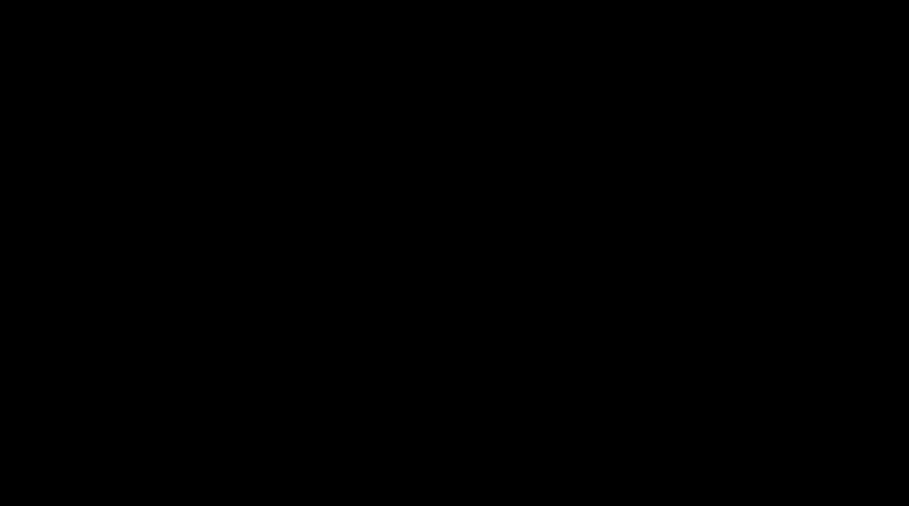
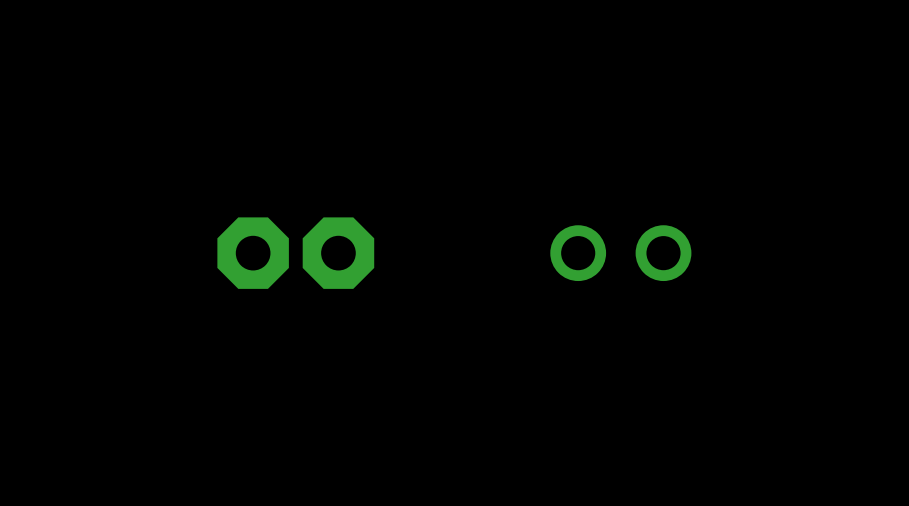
part: none -> (295, 253)
part: none -> (620, 253)

